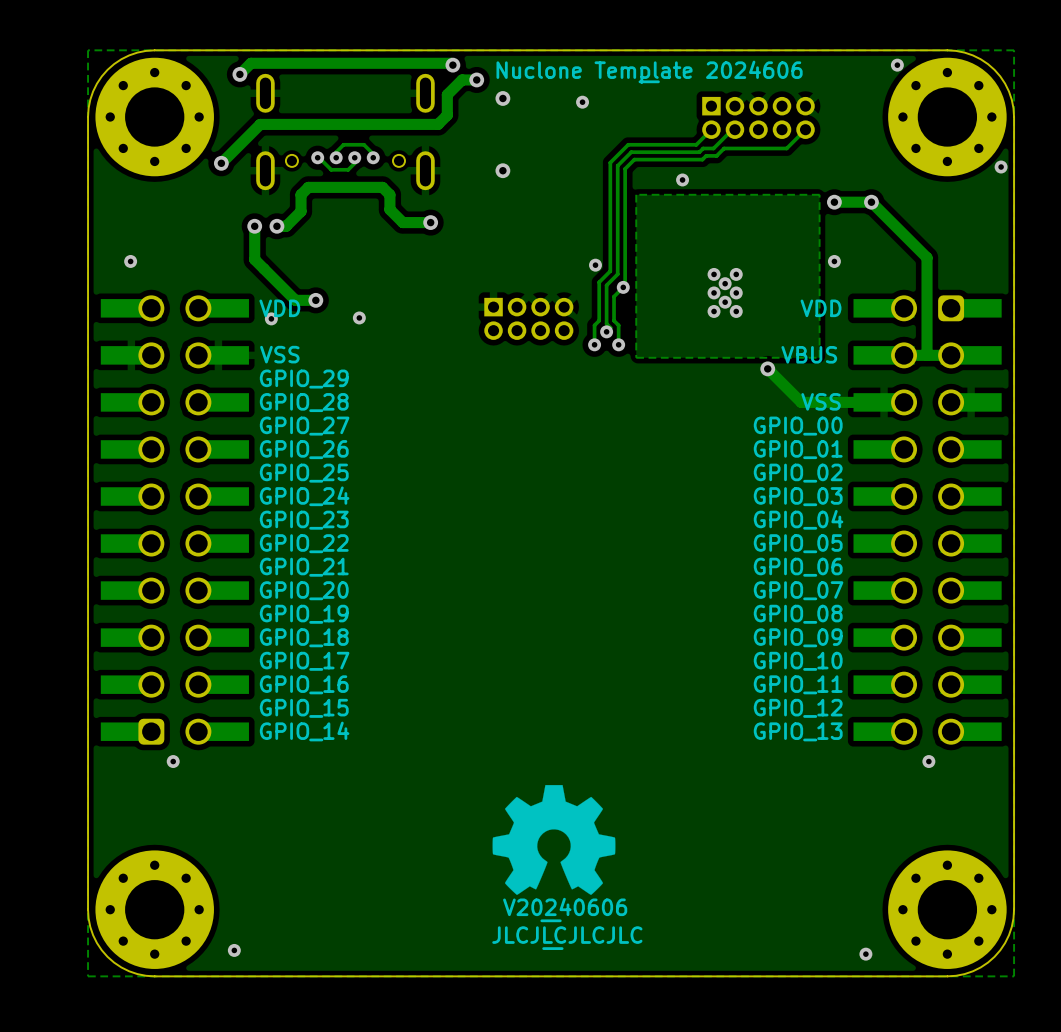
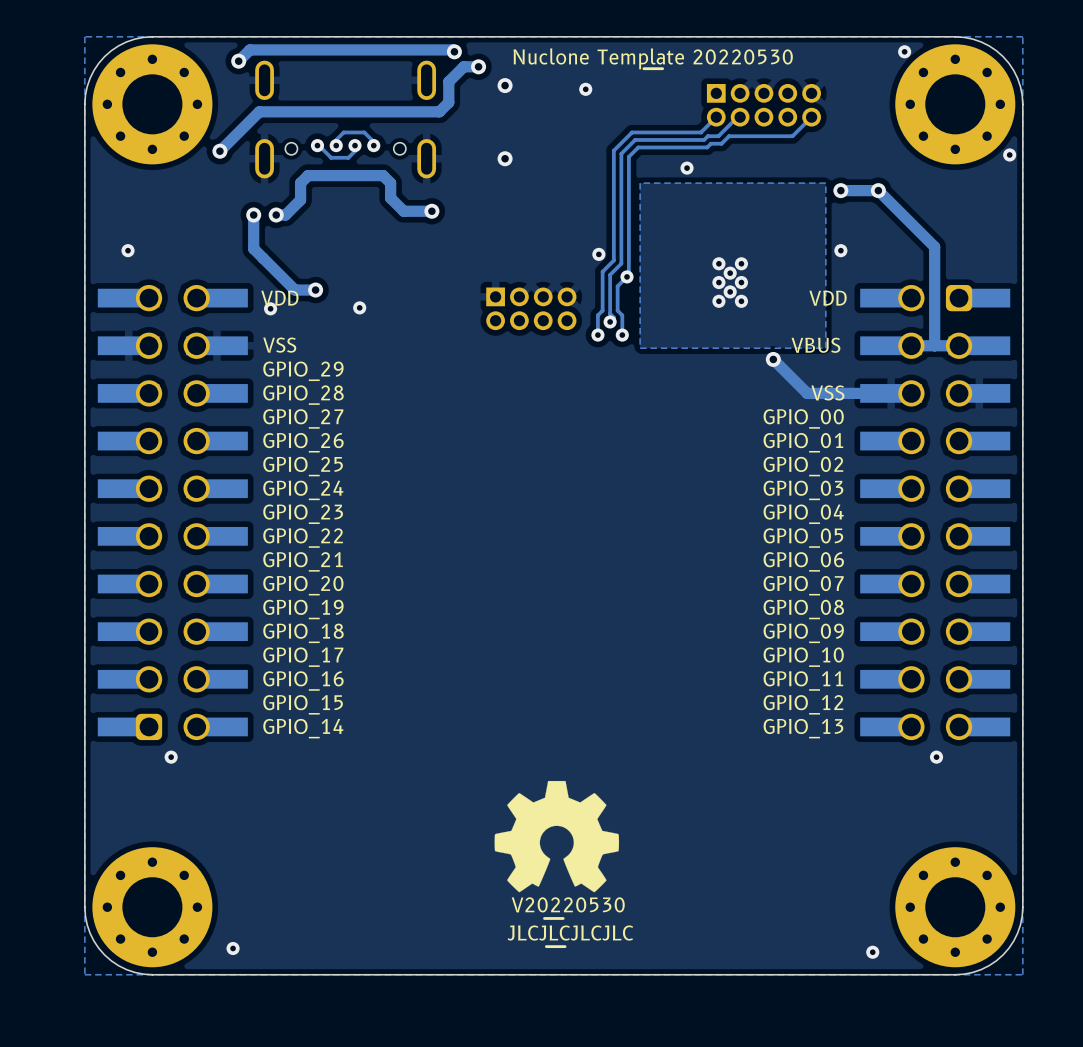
drawing shape: [496, 60, 803, 84] -> [513, 48, 793, 71]
drawing shape: [503, 897, 628, 923] -> [511, 897, 625, 920]

